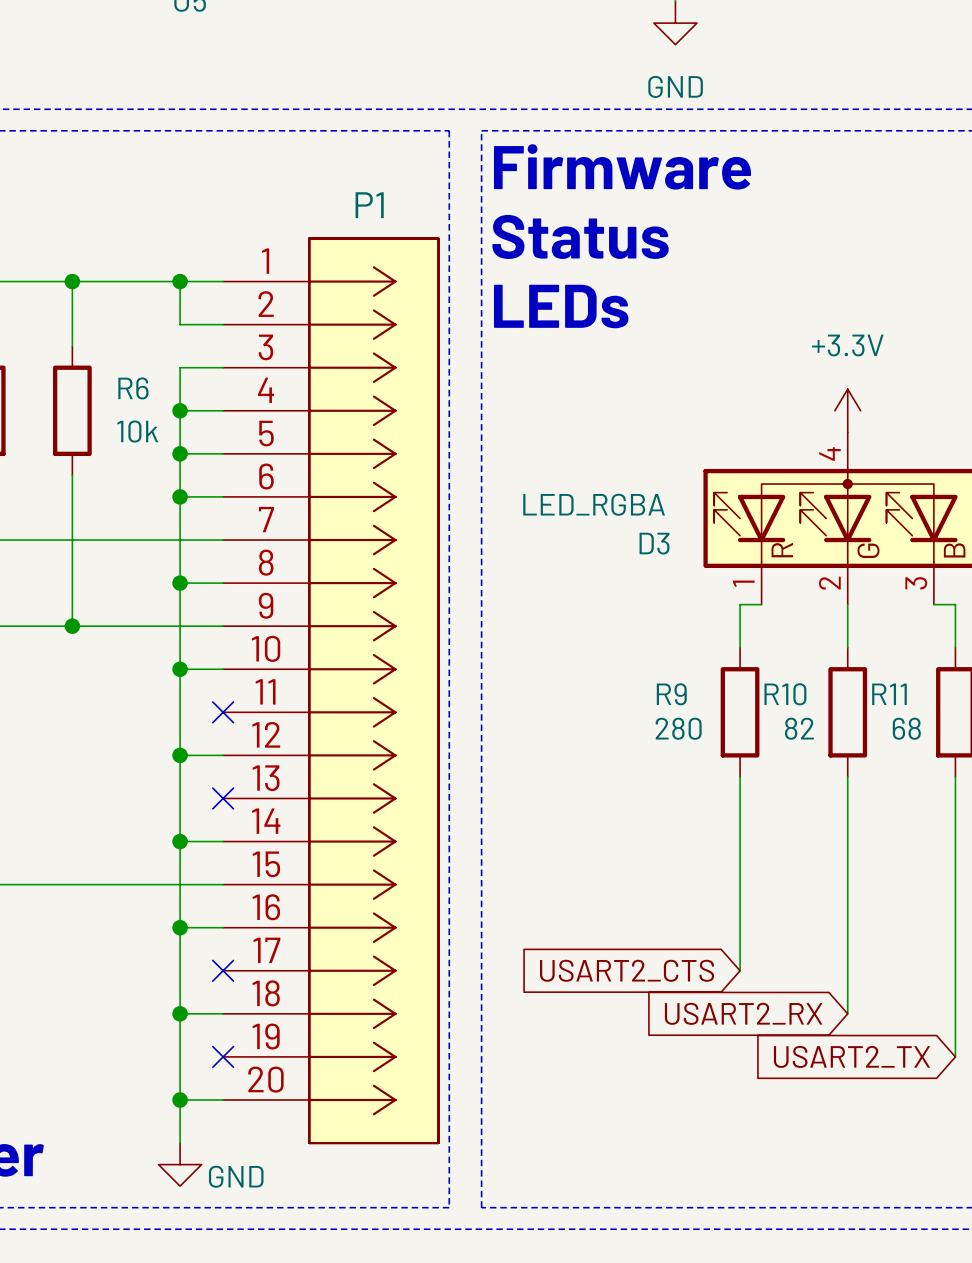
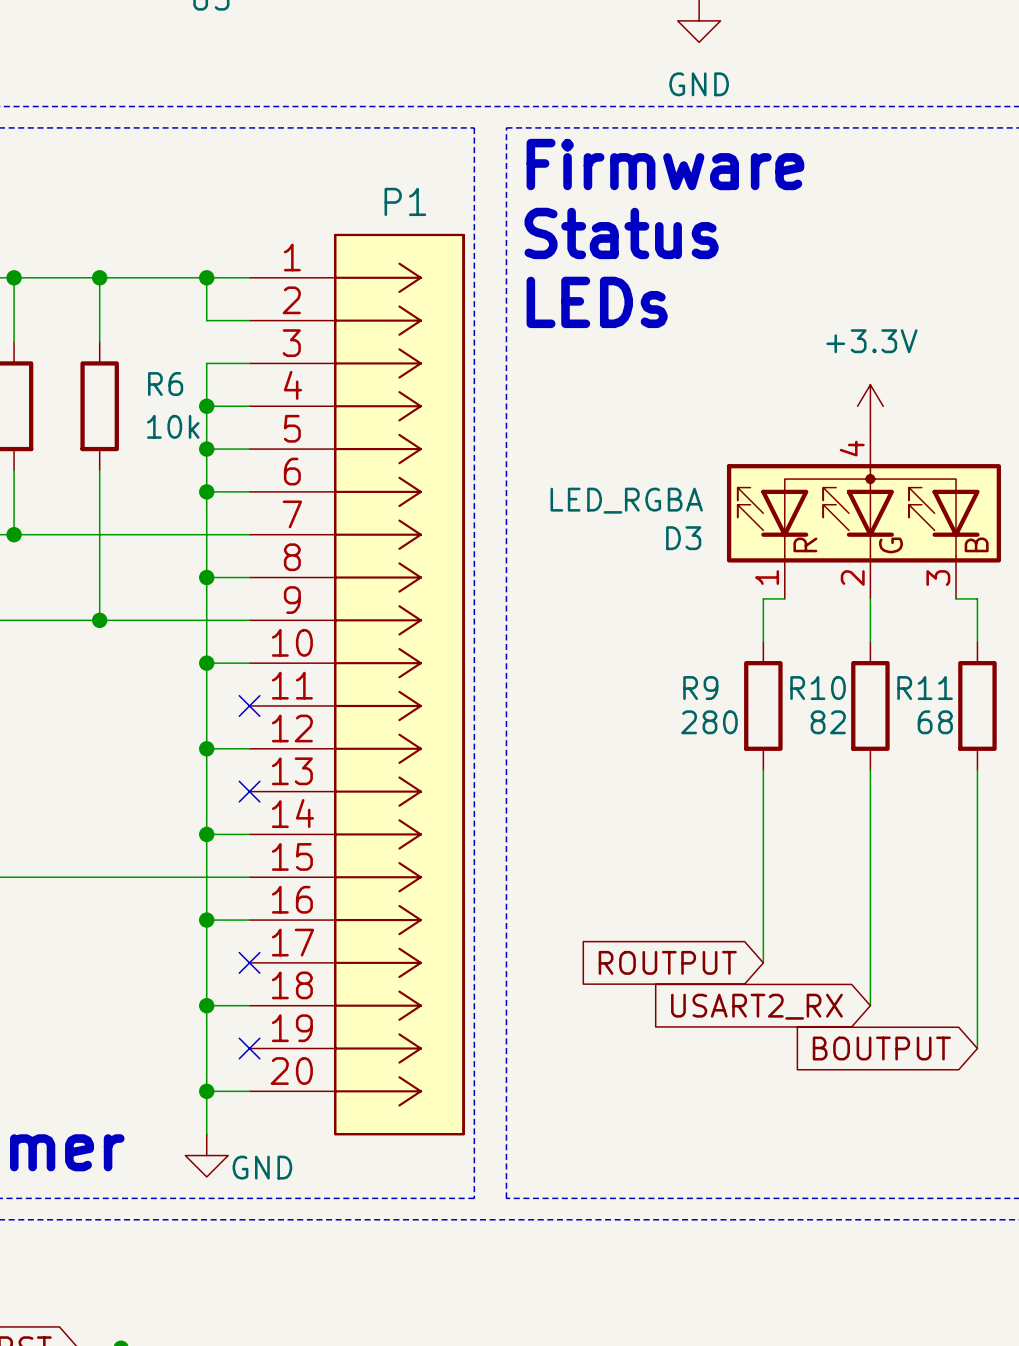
global label: USART2_CTS (627, 970) -> ROUTPUT (667, 962)
global label: USART2_TX (851, 1056) -> BOUTPUT (881, 1048)

